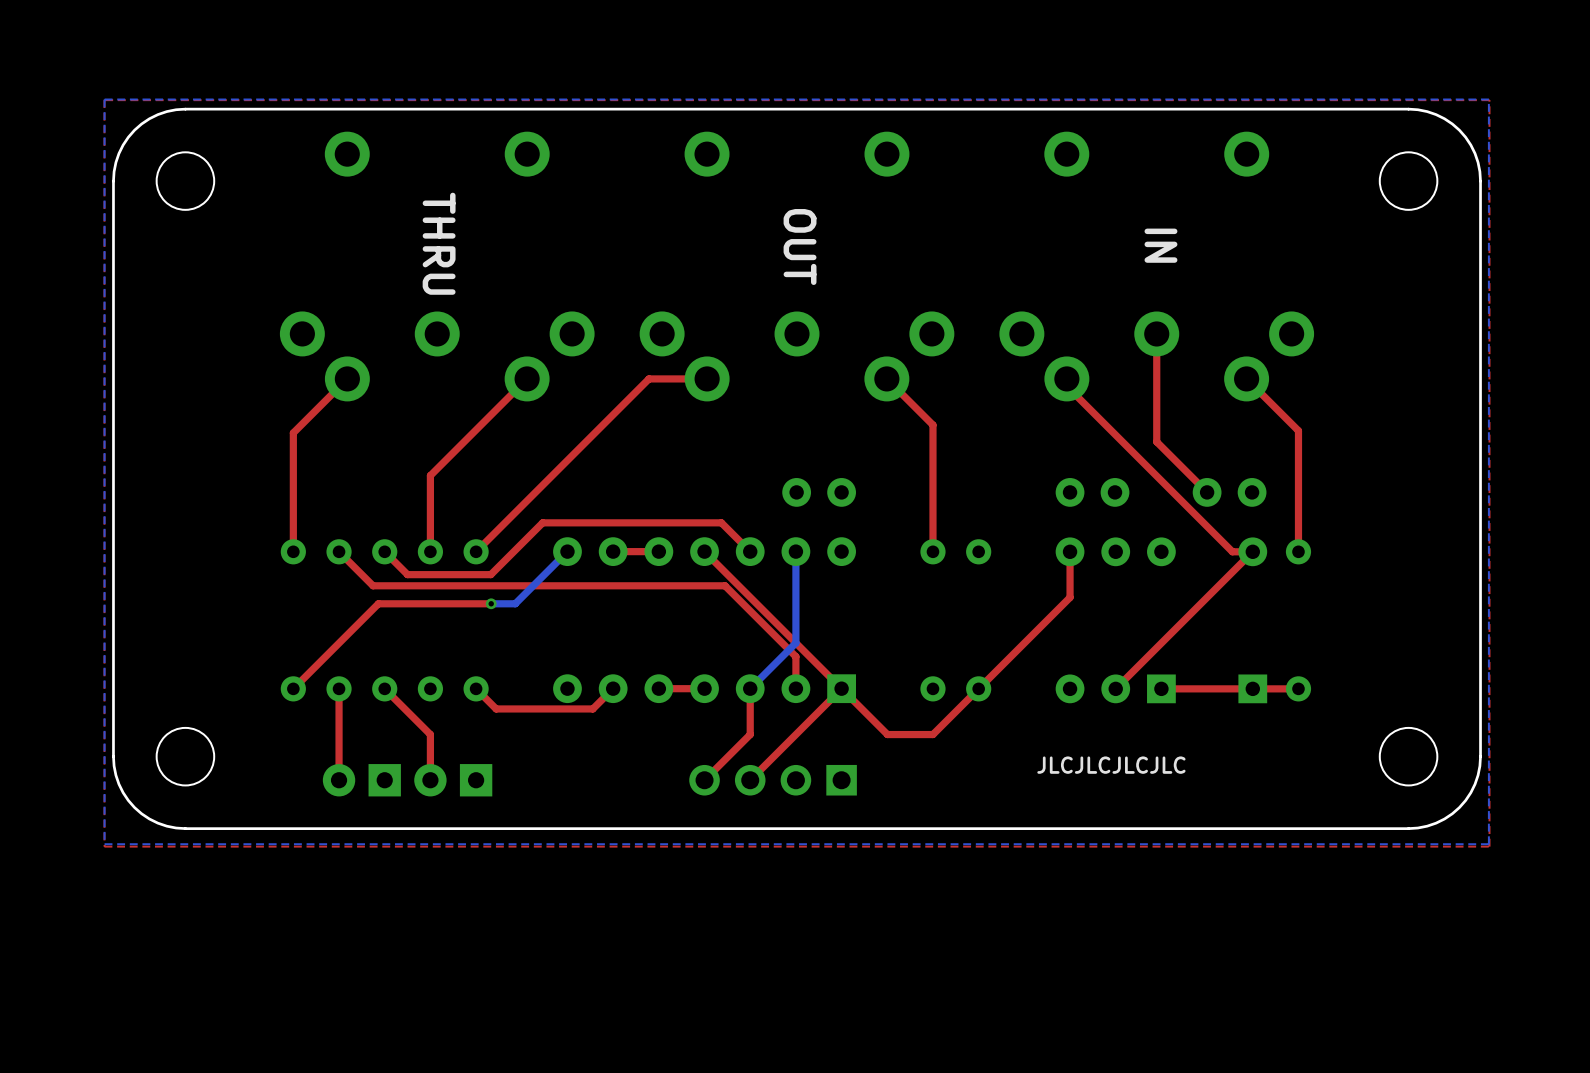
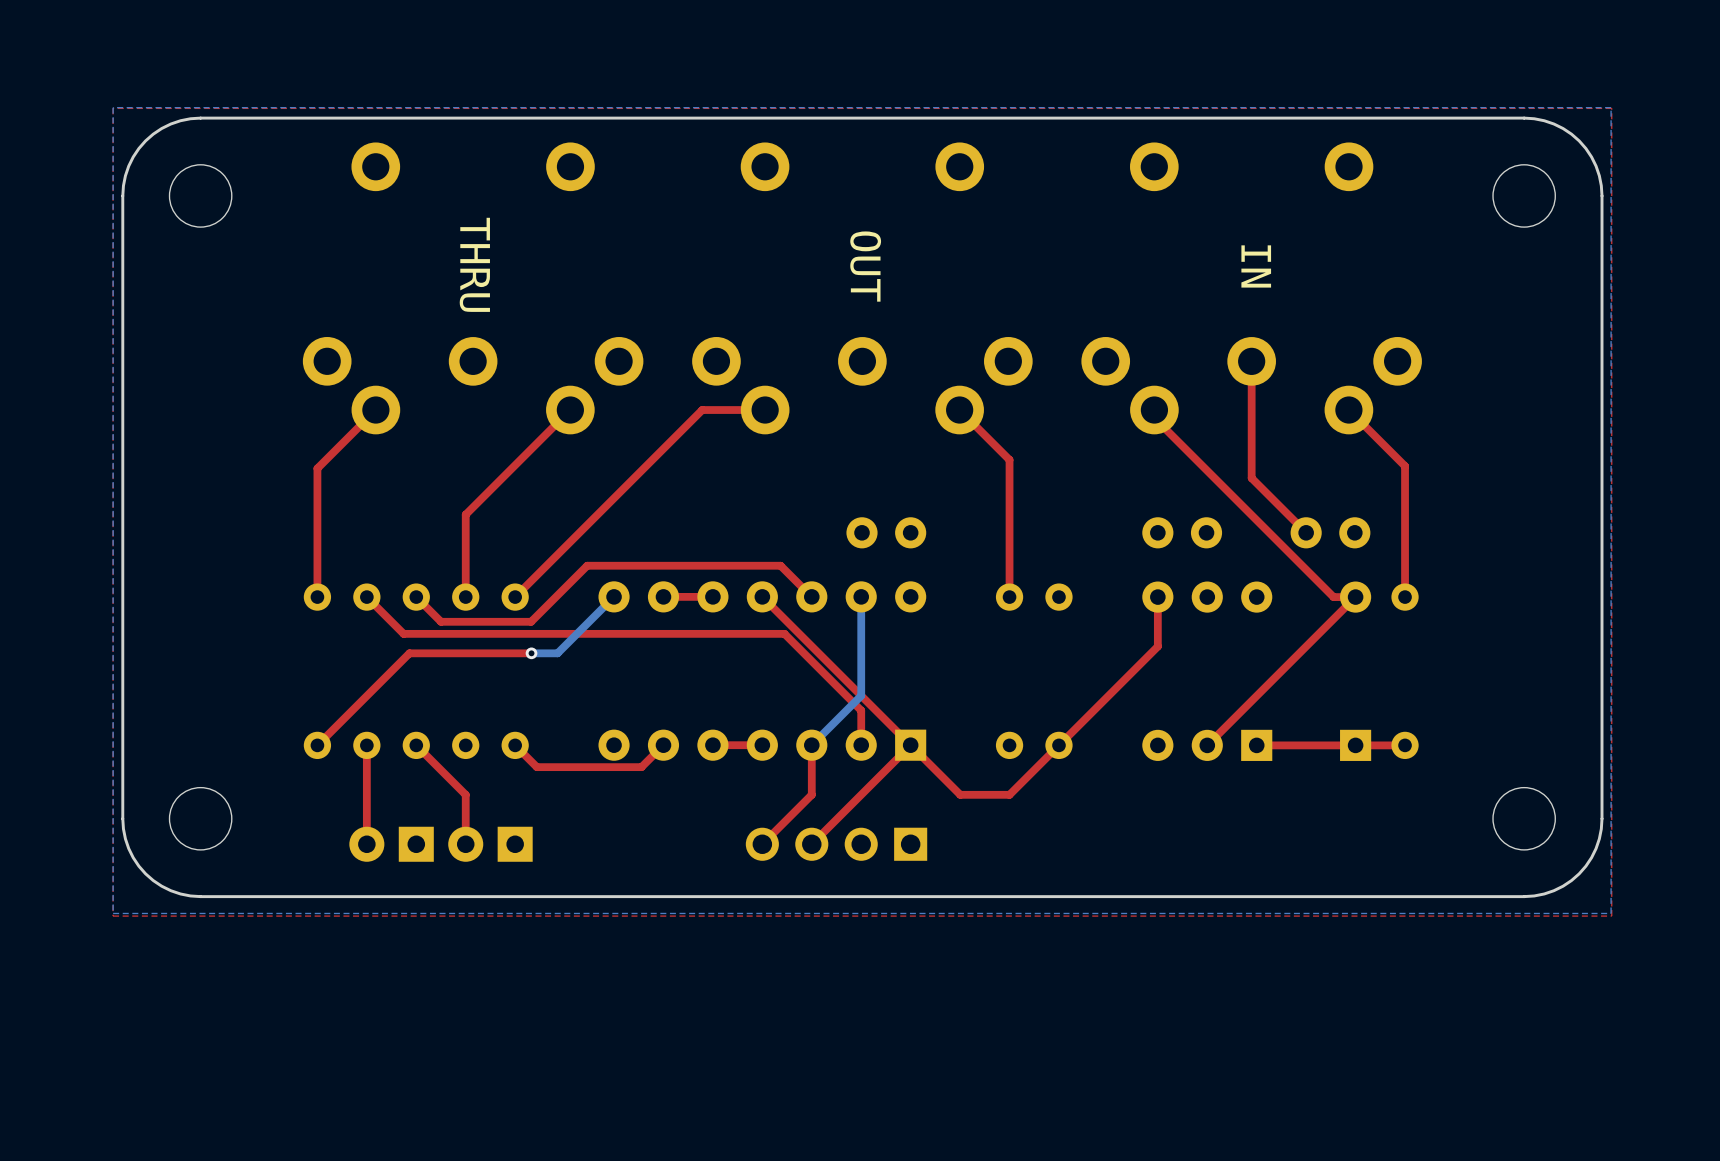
text: JLCJLCJLCJLC (1111, 765) -> none

